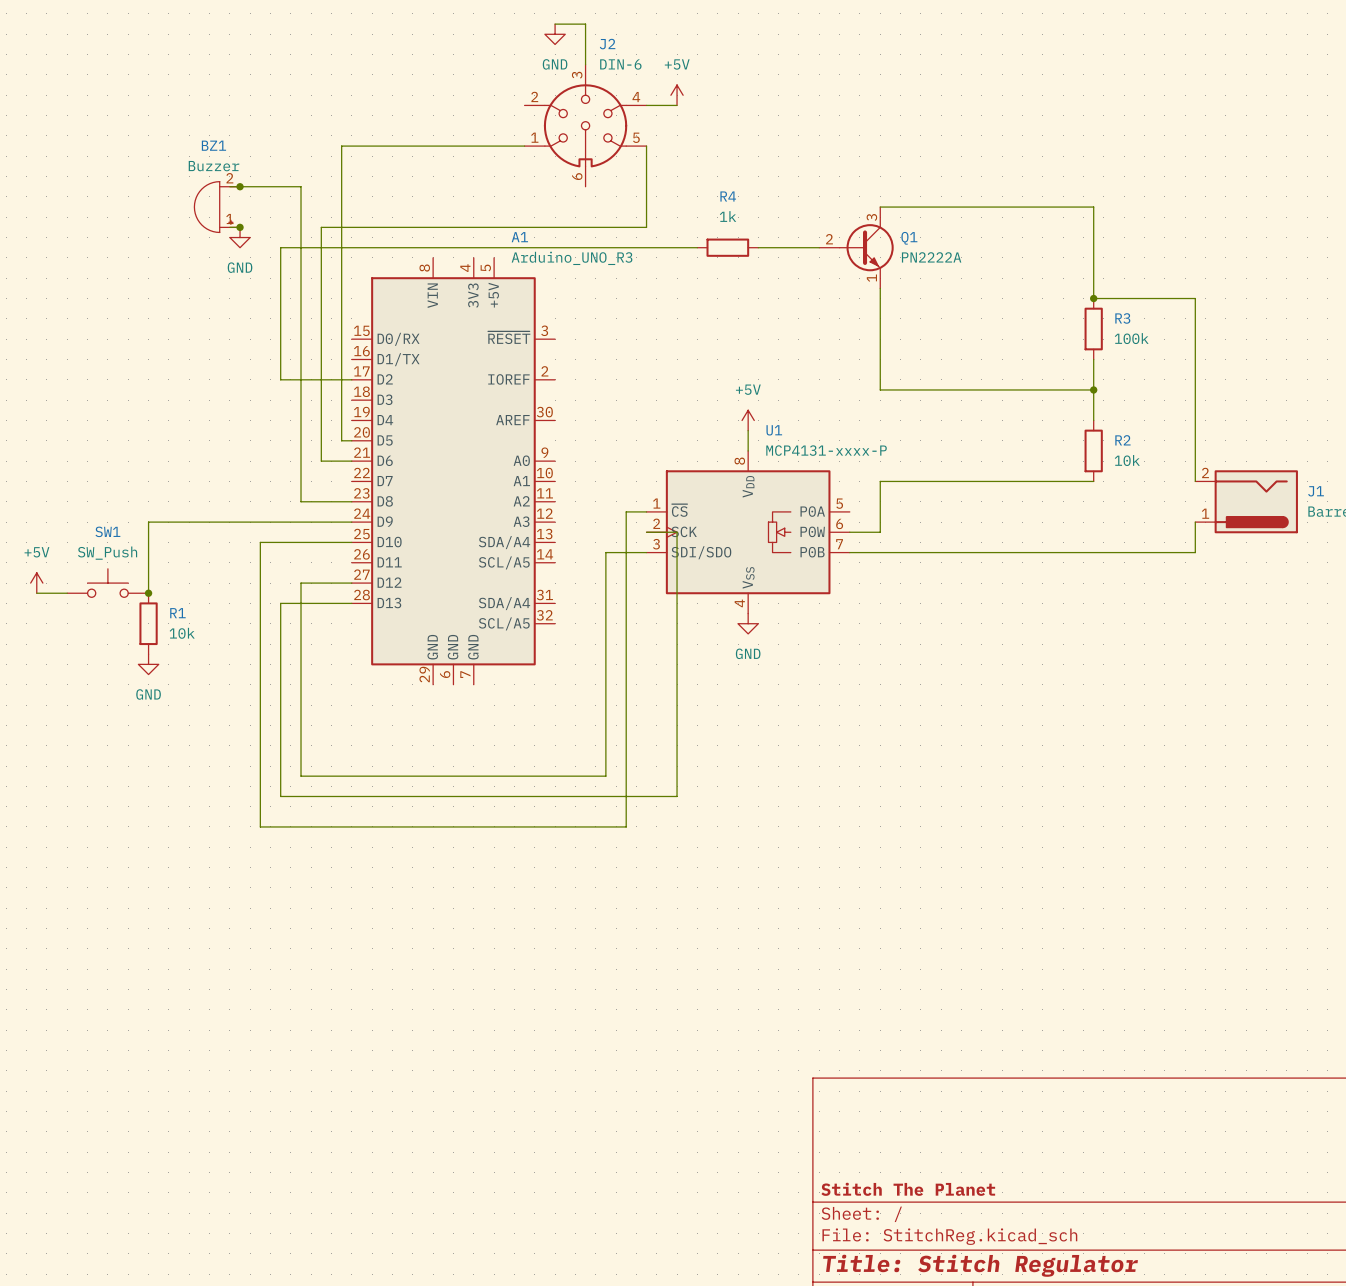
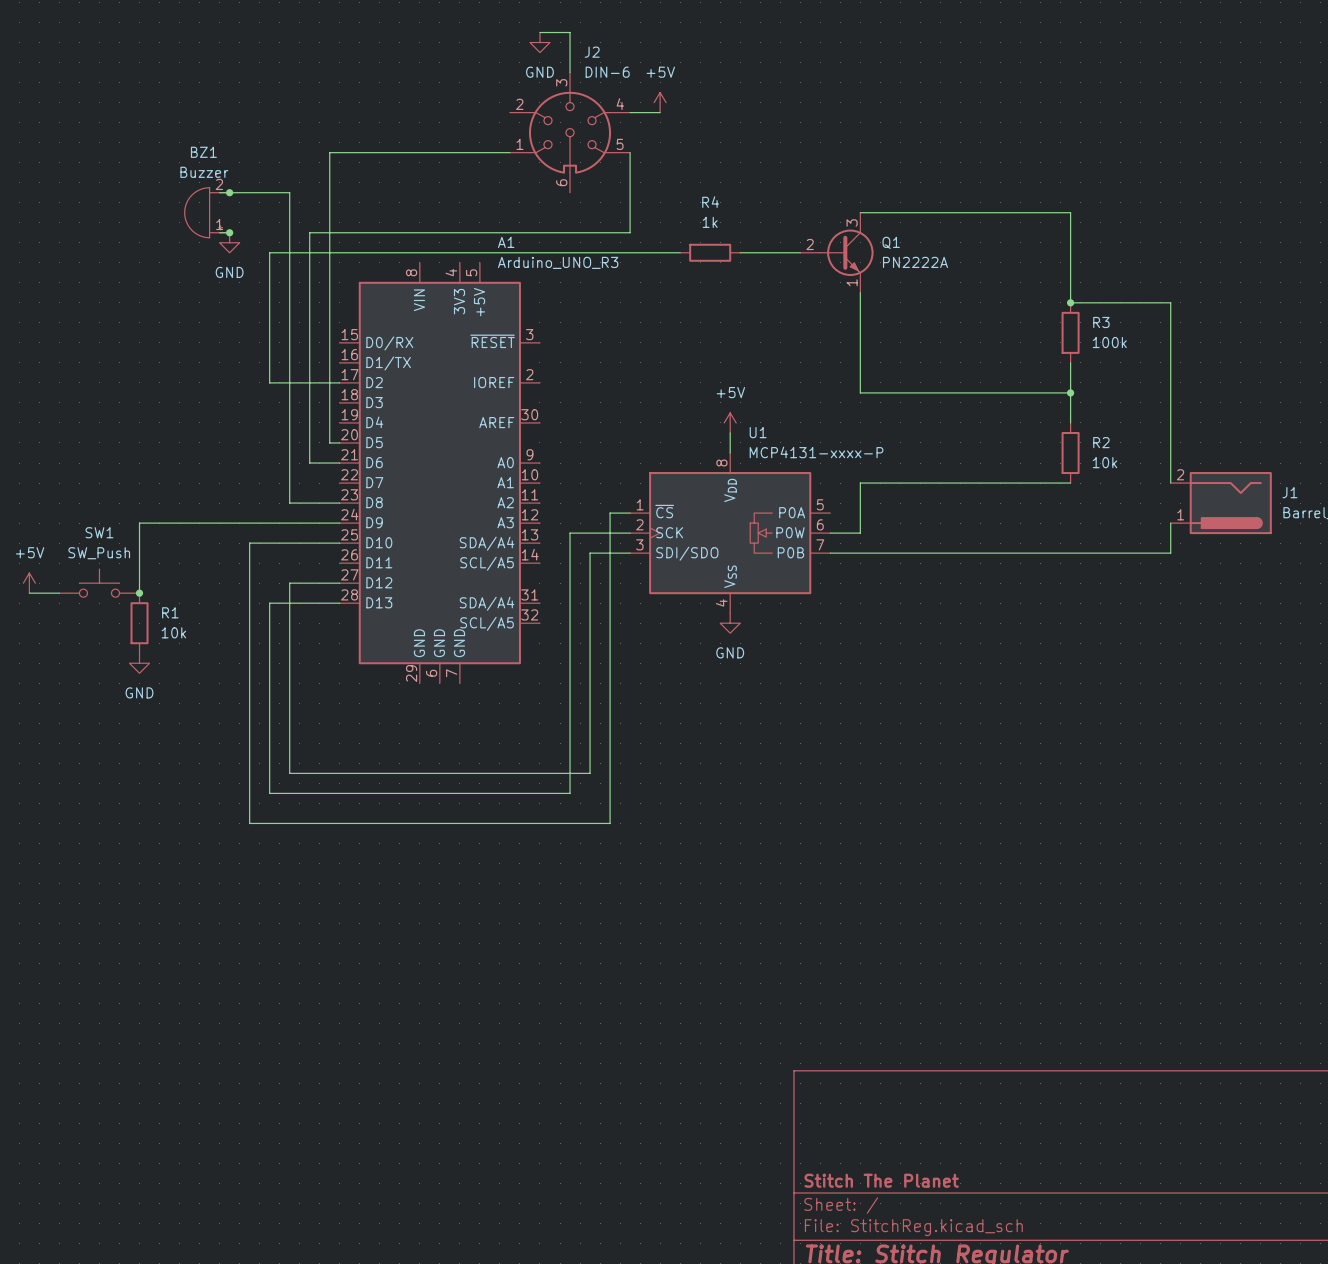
wire: (646, 532) (677, 532) (677, 796) (585, 796) -> (630, 533) (570, 533) (570, 793)

